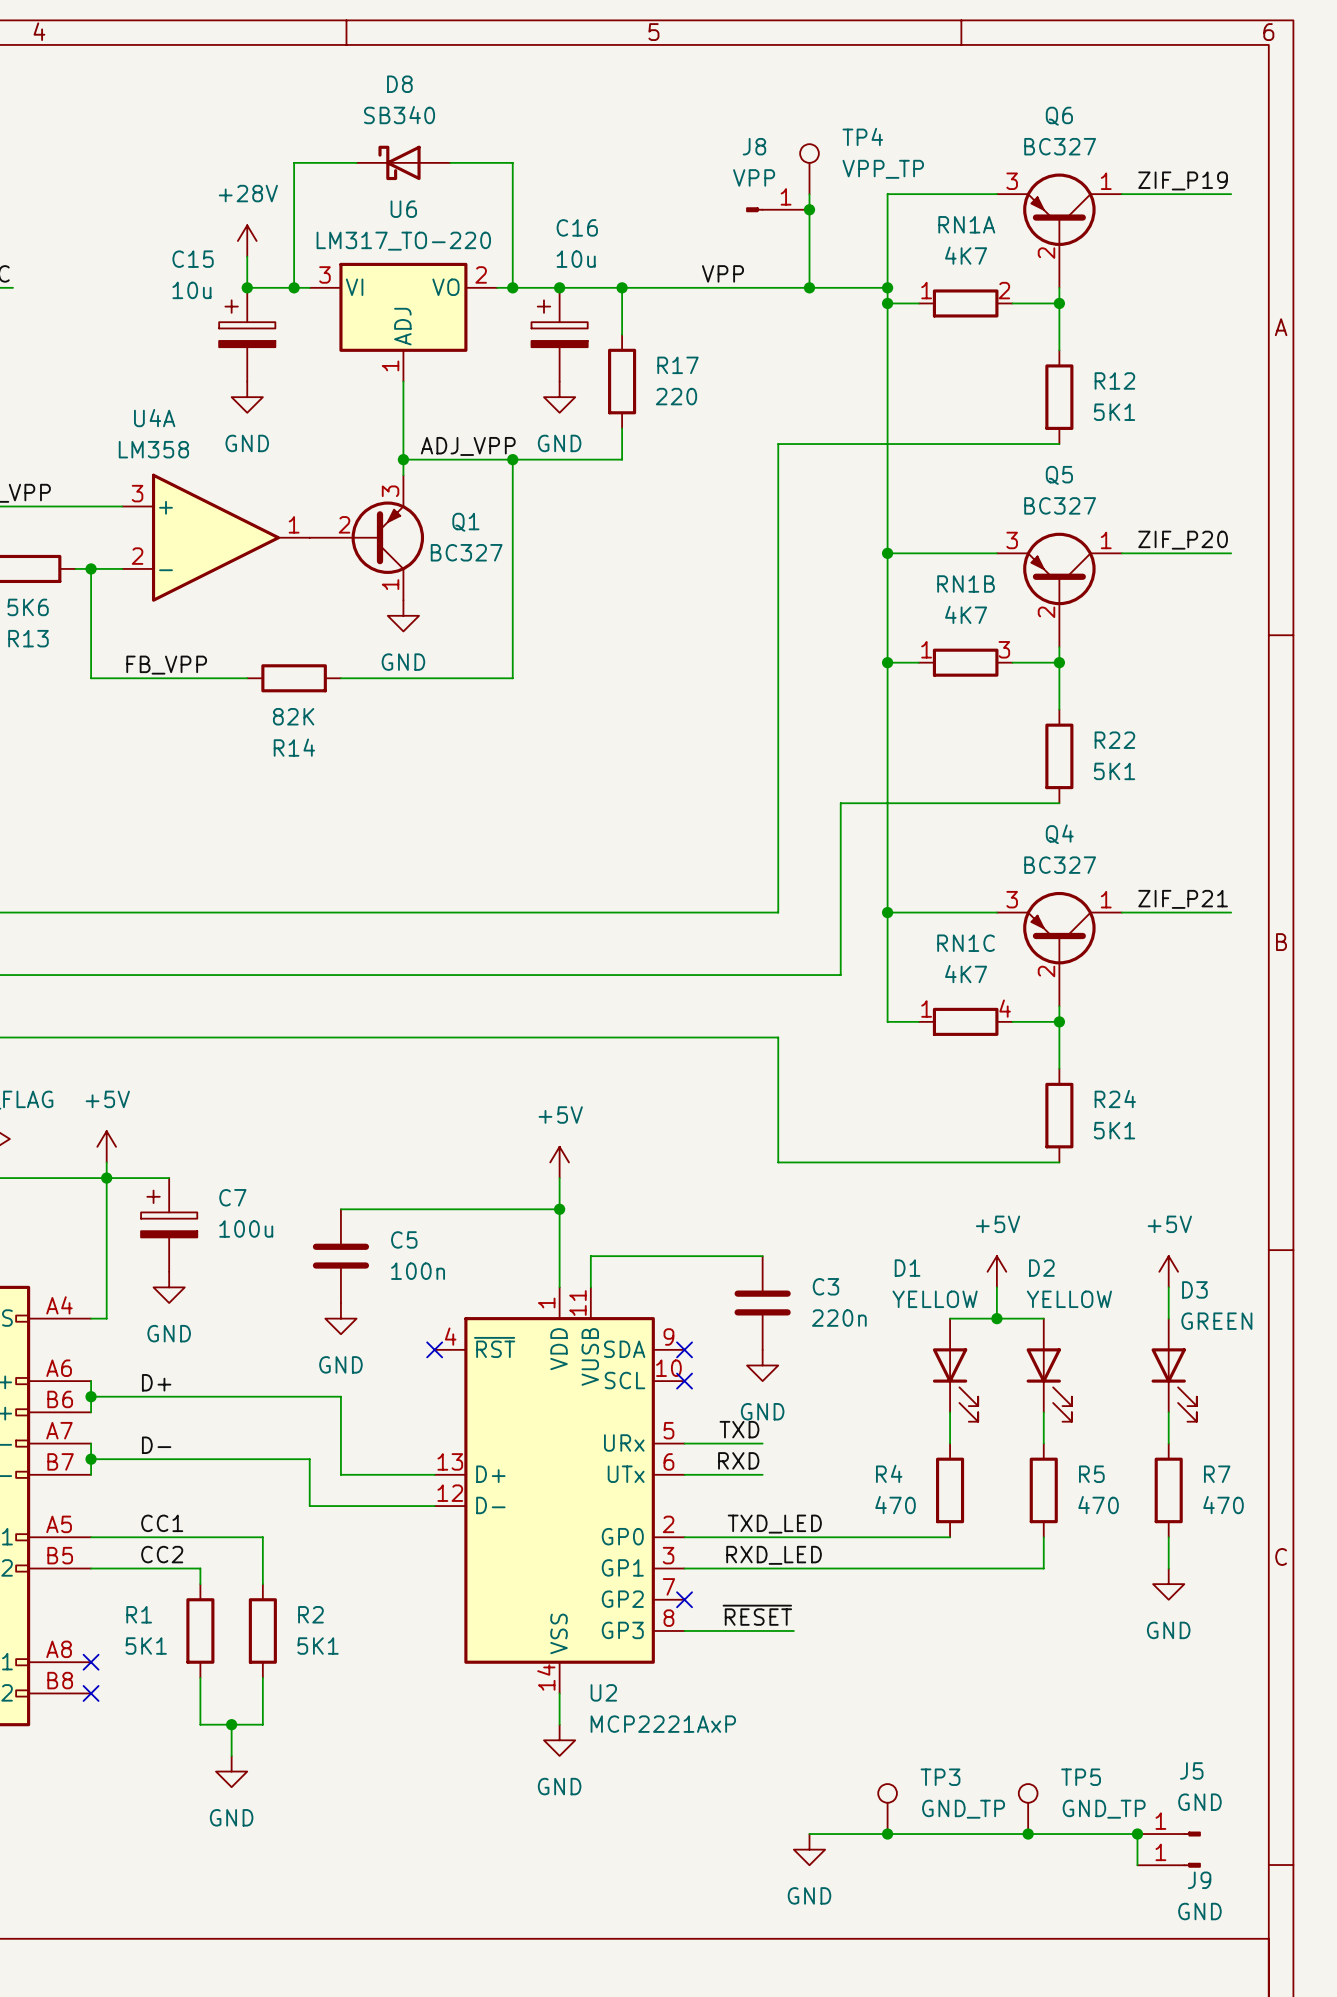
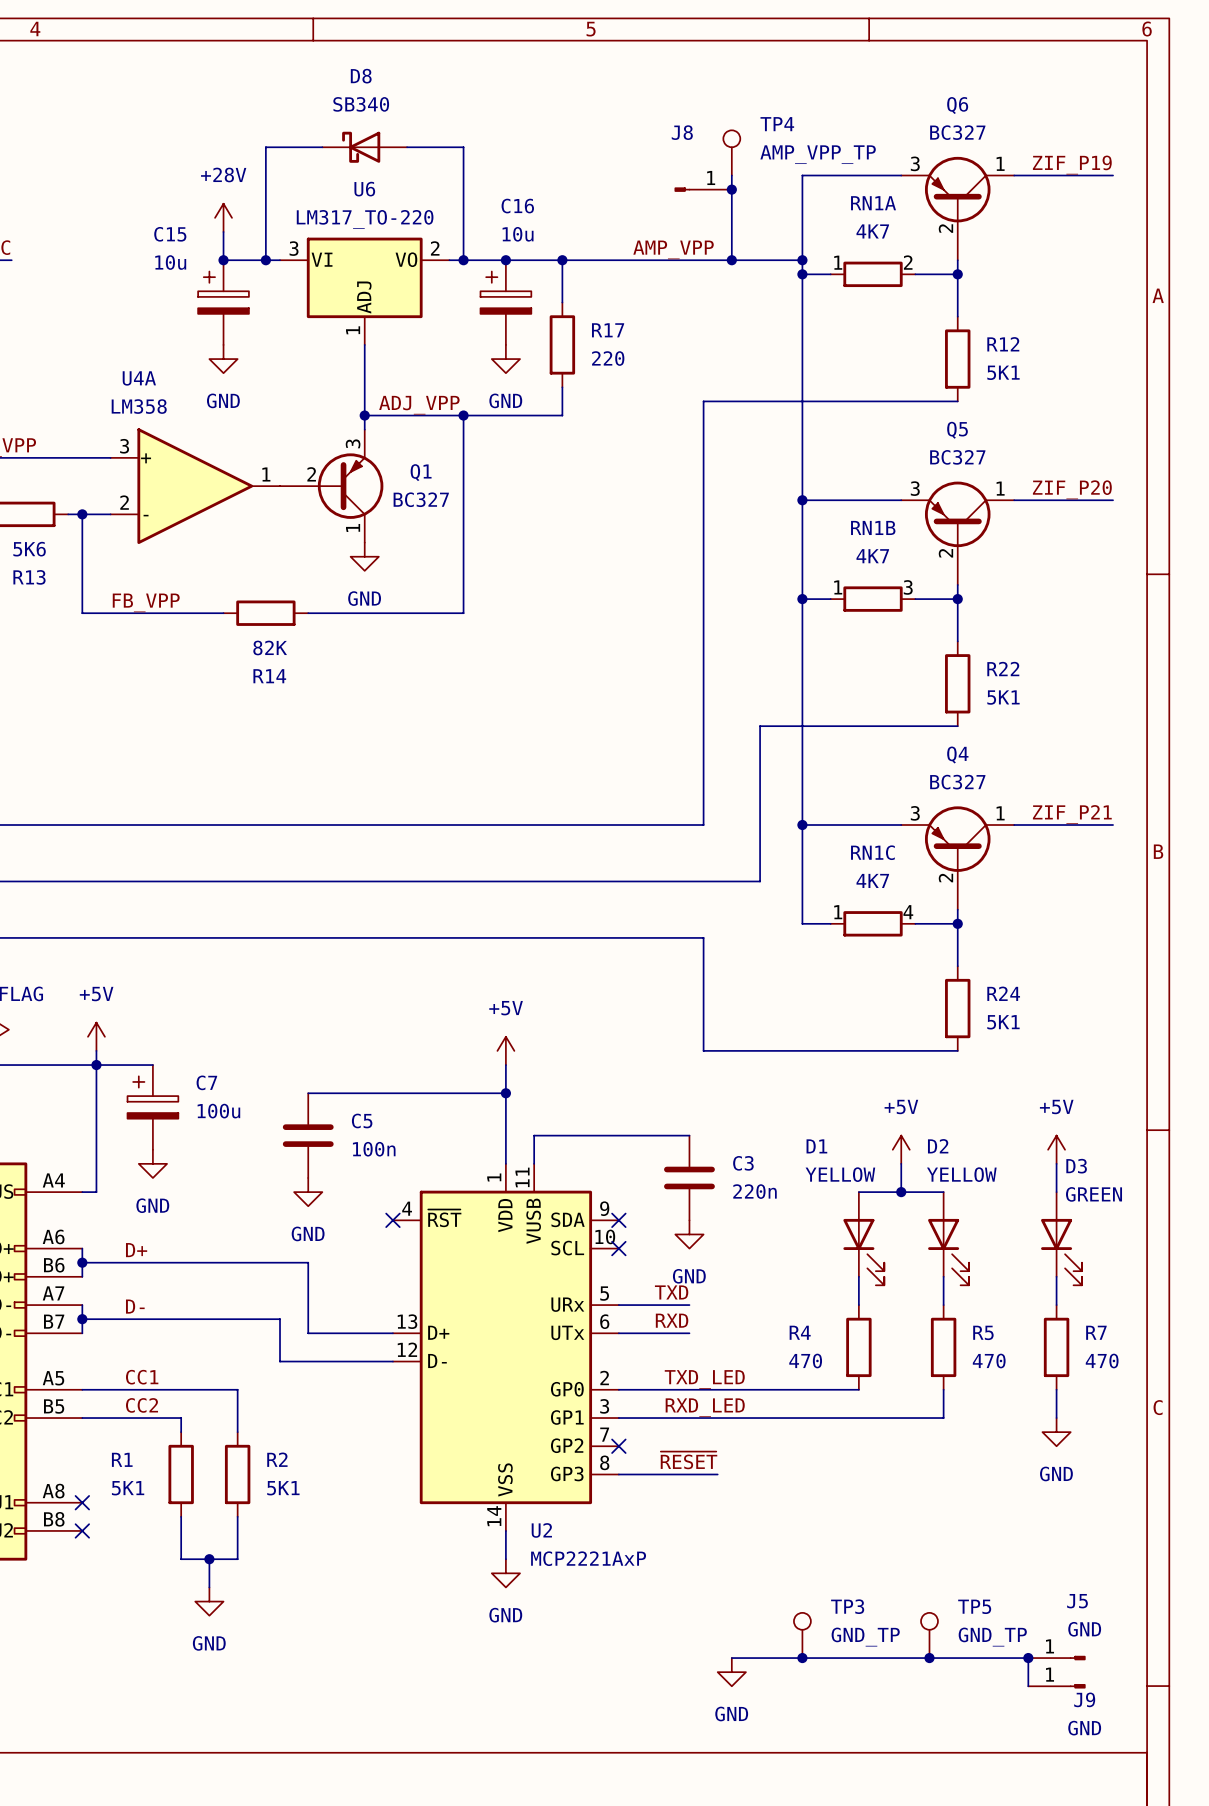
TP4 value: VPP_TP (883, 169) -> AMP_VPP_TP (818, 154)
J8 value: VPP (754, 177) -> none
label: VPP (722, 273) -> AMP_VPP (673, 249)

